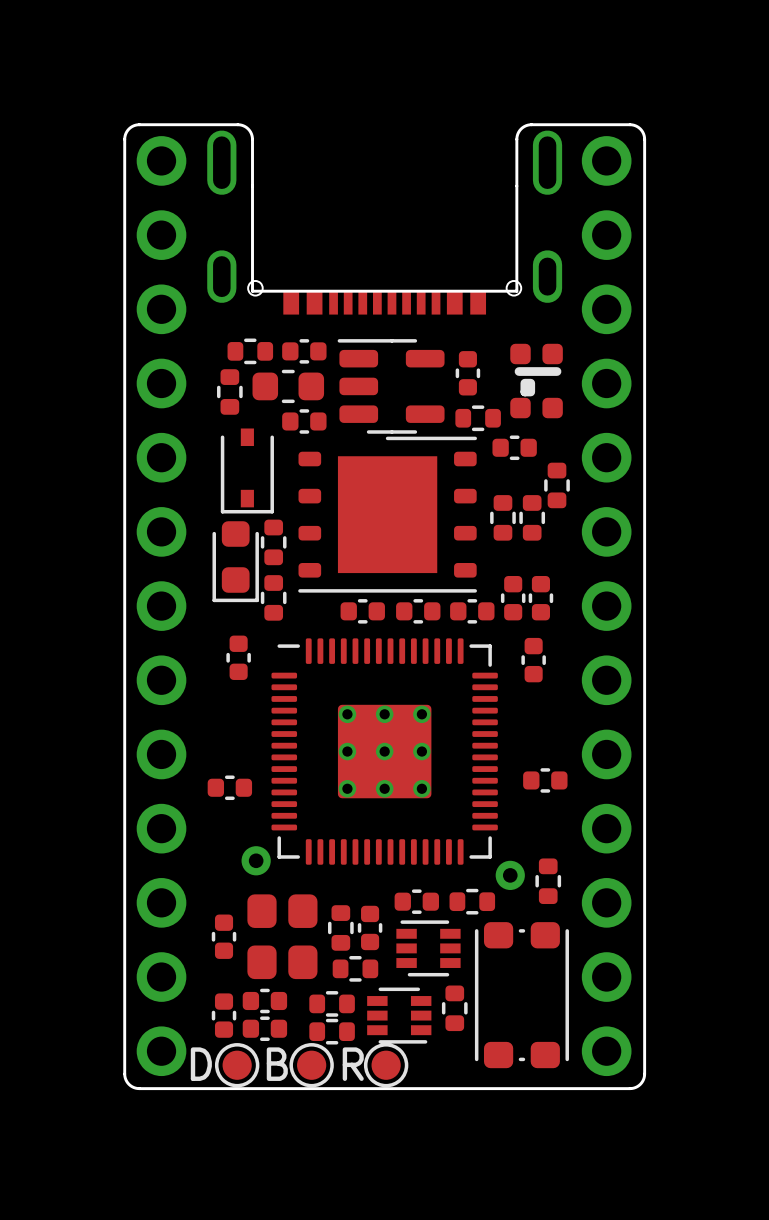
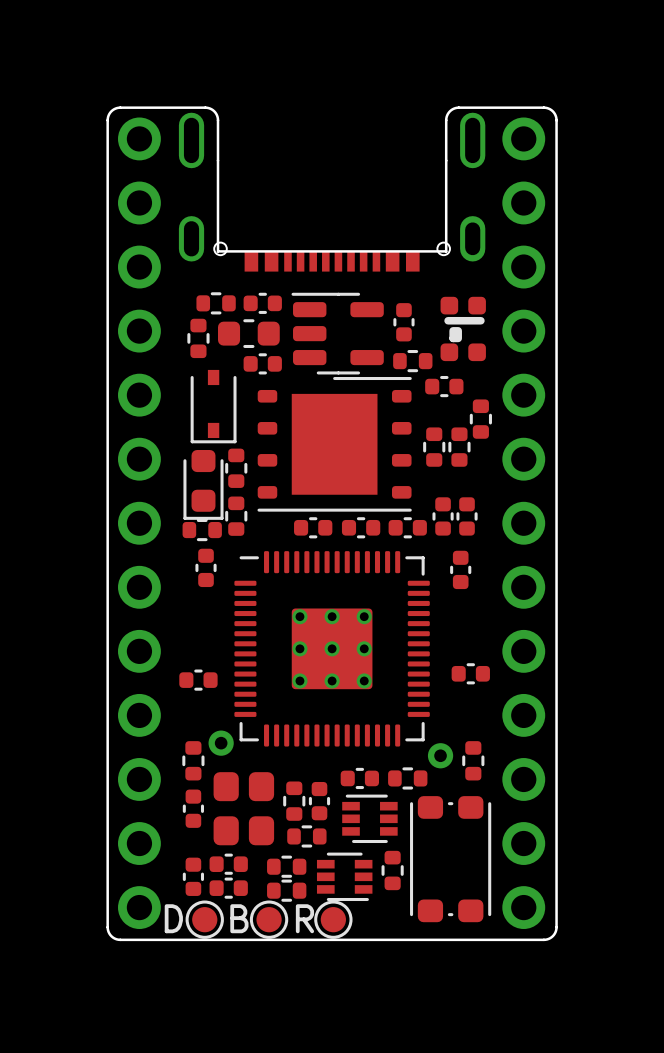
part: none -> (202, 530)
part: none -> (193, 760)

